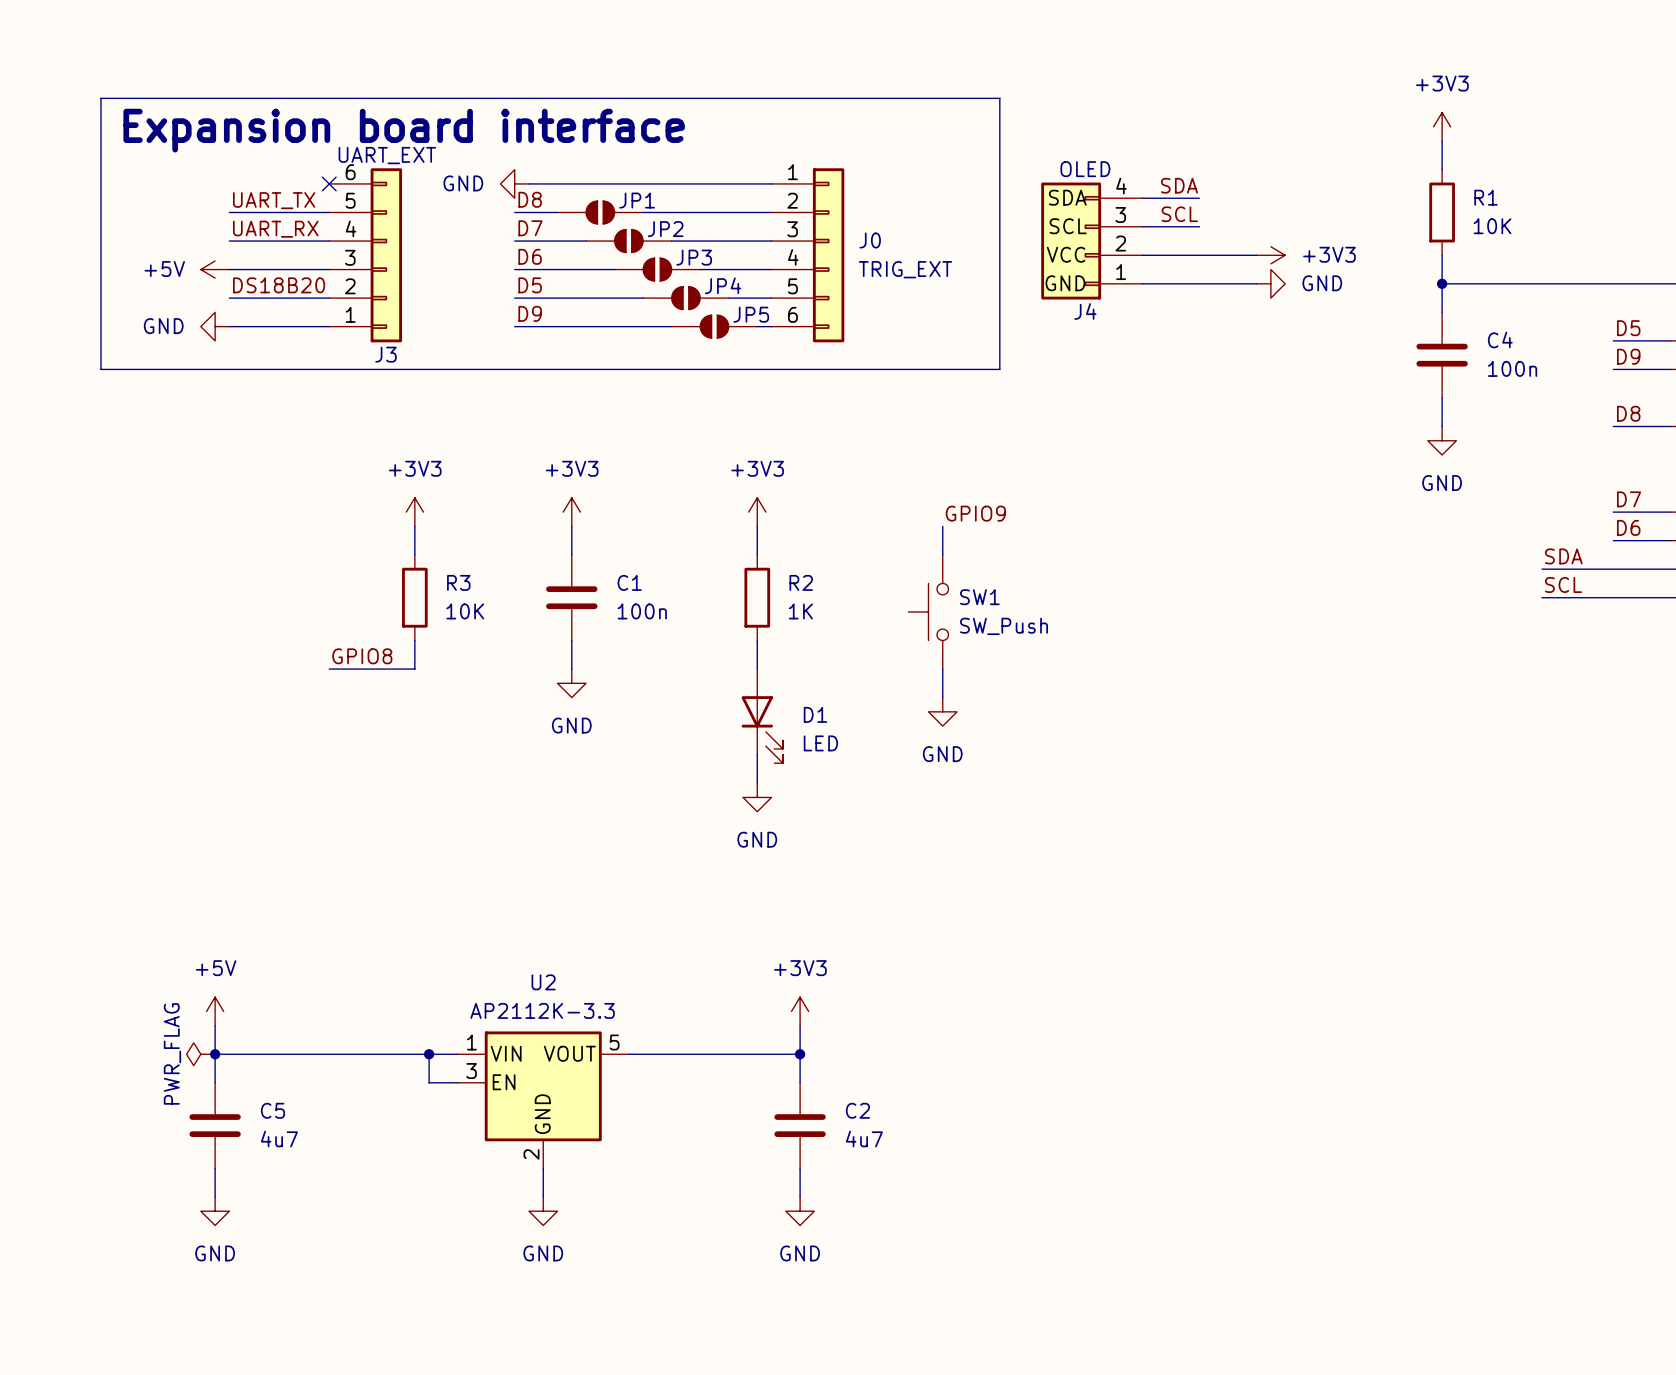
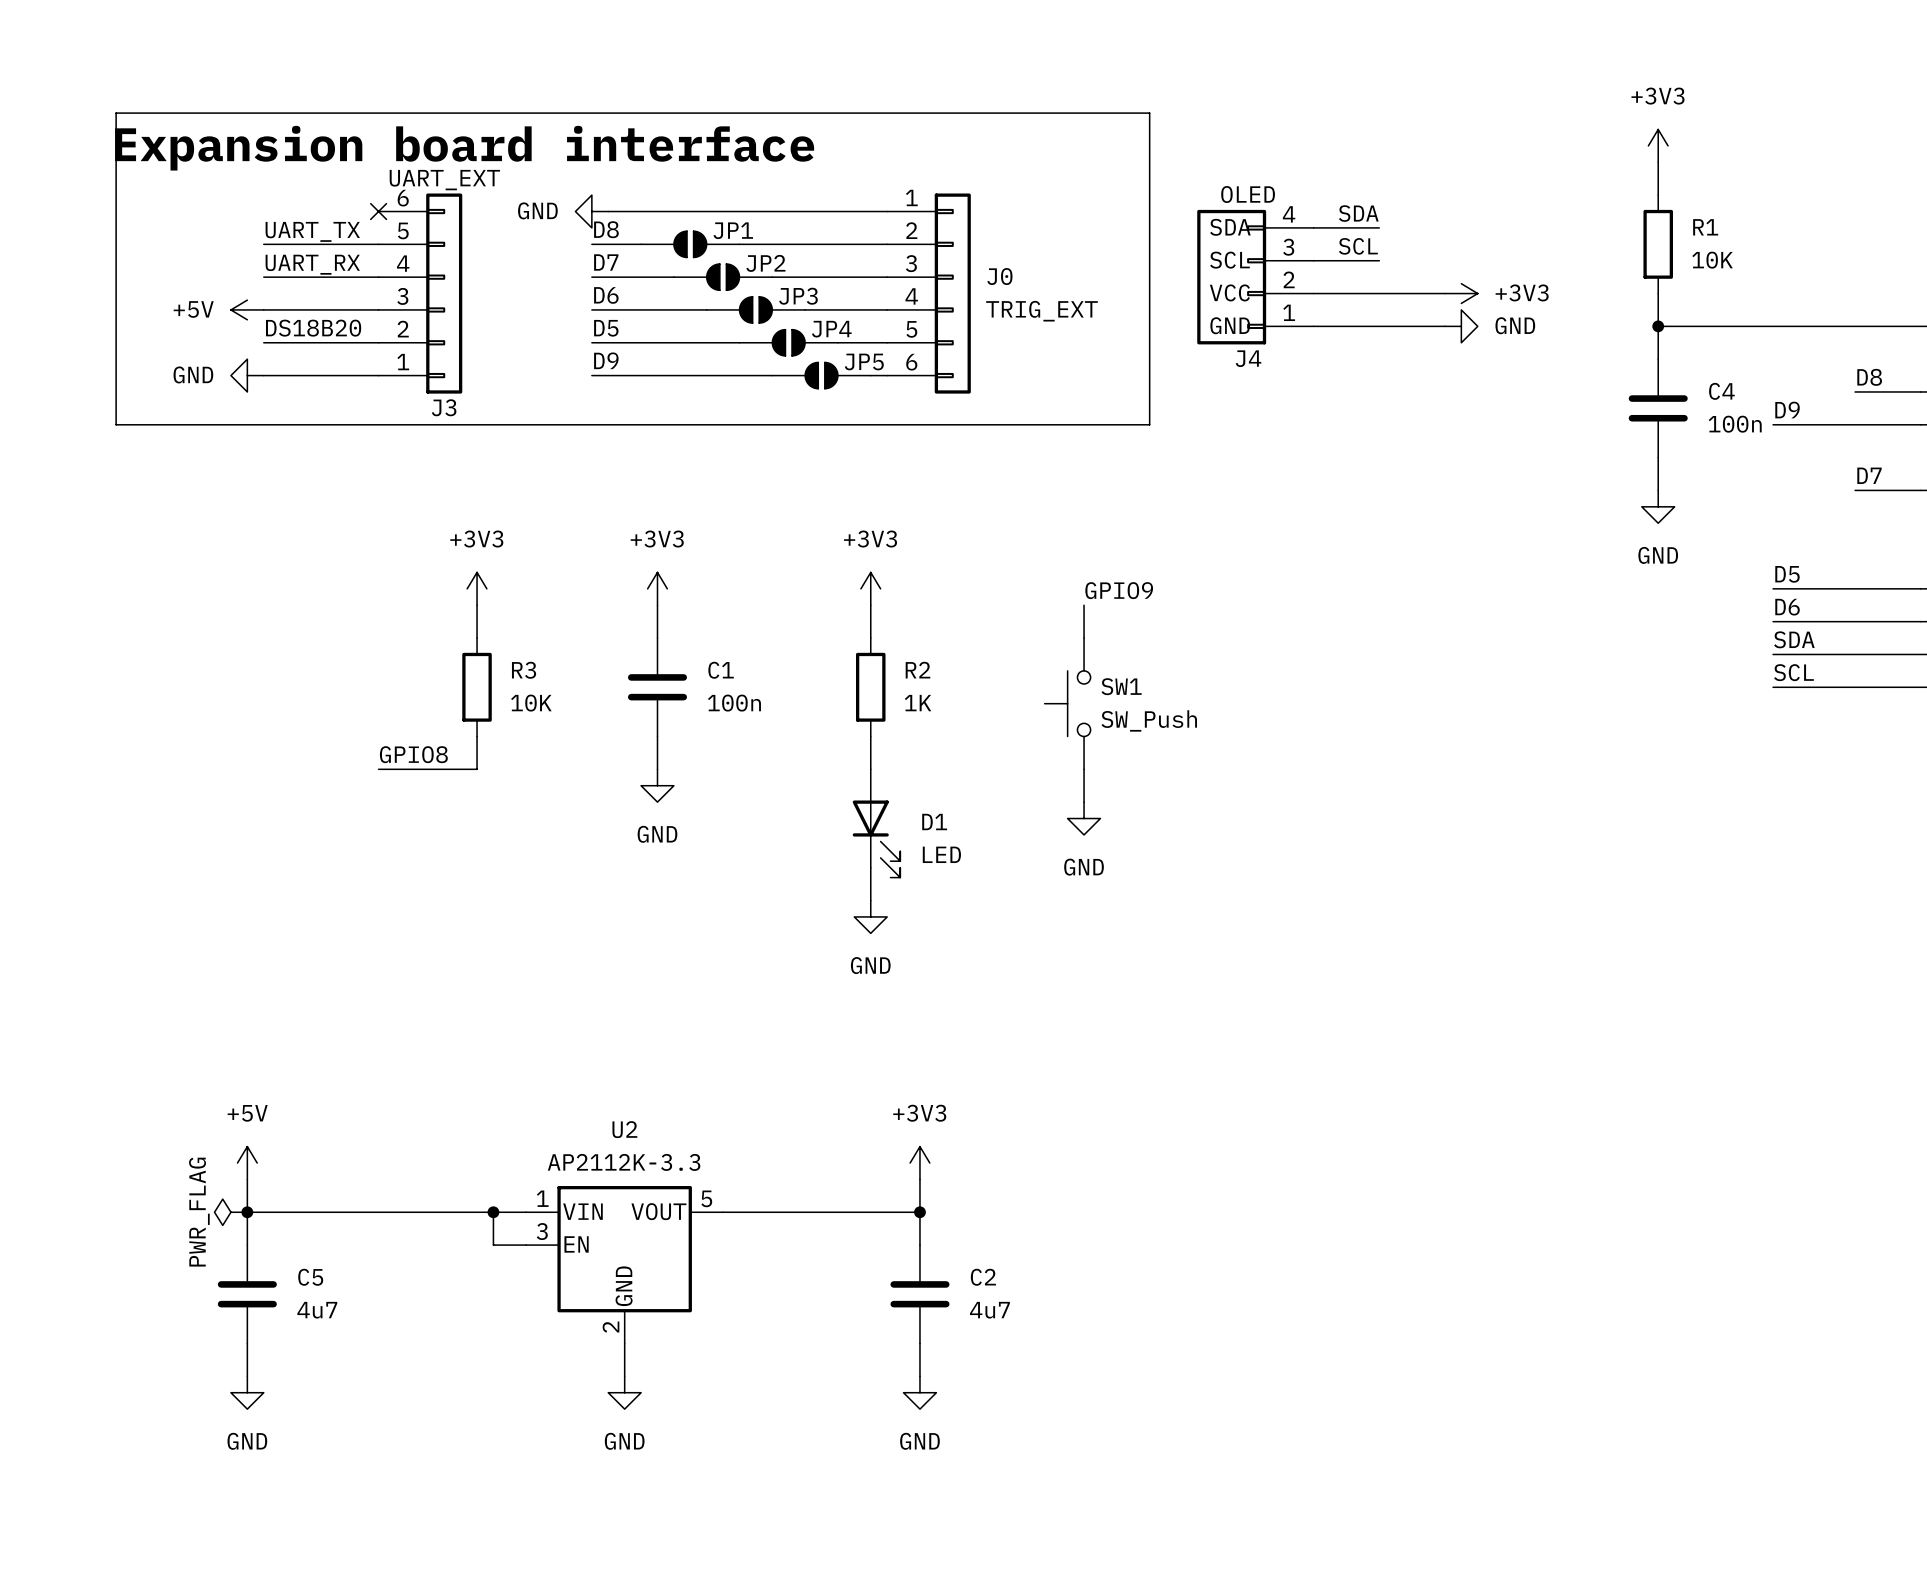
label: D5 (1628, 328) -> D8 (1869, 377)
label position: D9 (1628, 356) -> D9 (1787, 410)
wire: none -> (1773, 424) (1855, 424)
label: D8 (1628, 413) -> D7 (1869, 475)
label: none -> D5 (1787, 574)
label: D7 (1629, 499) -> none
wire: none -> (1773, 588) (1855, 588)
label position: D6 (1628, 527) -> D6 (1787, 607)
wire: none -> (1773, 621) (1855, 621)

